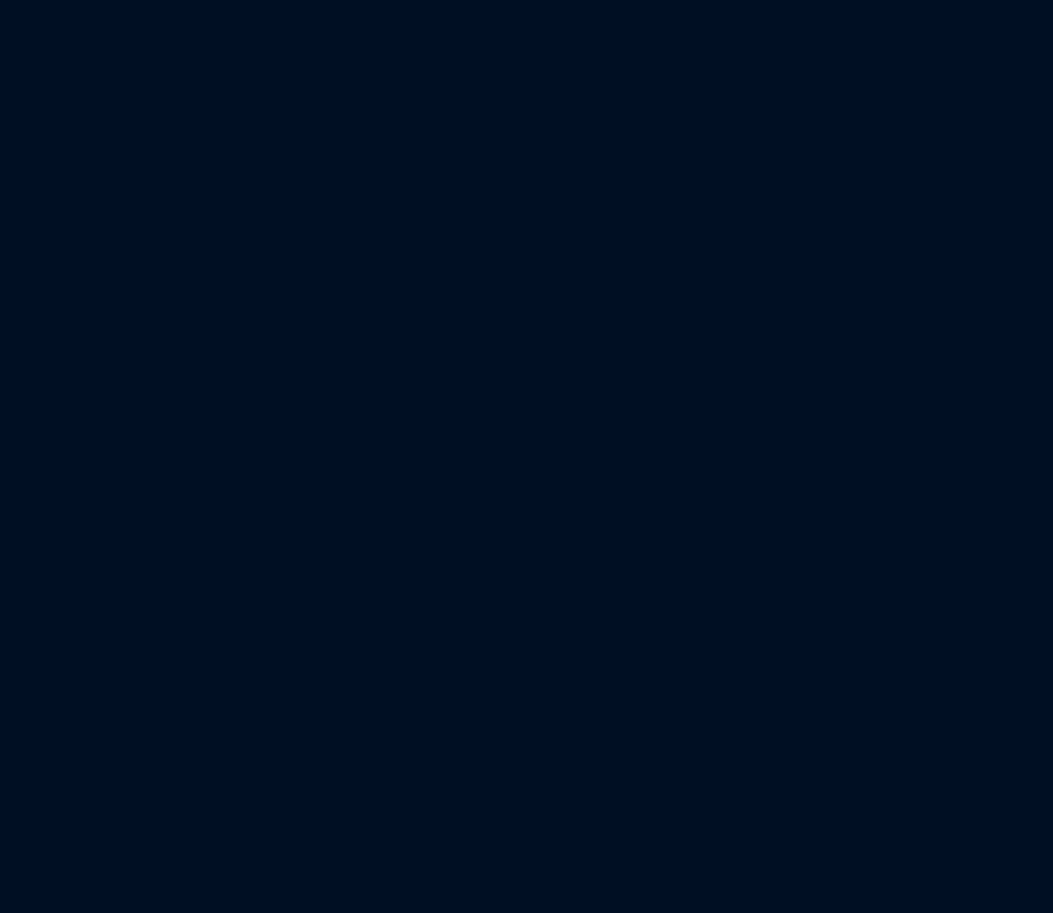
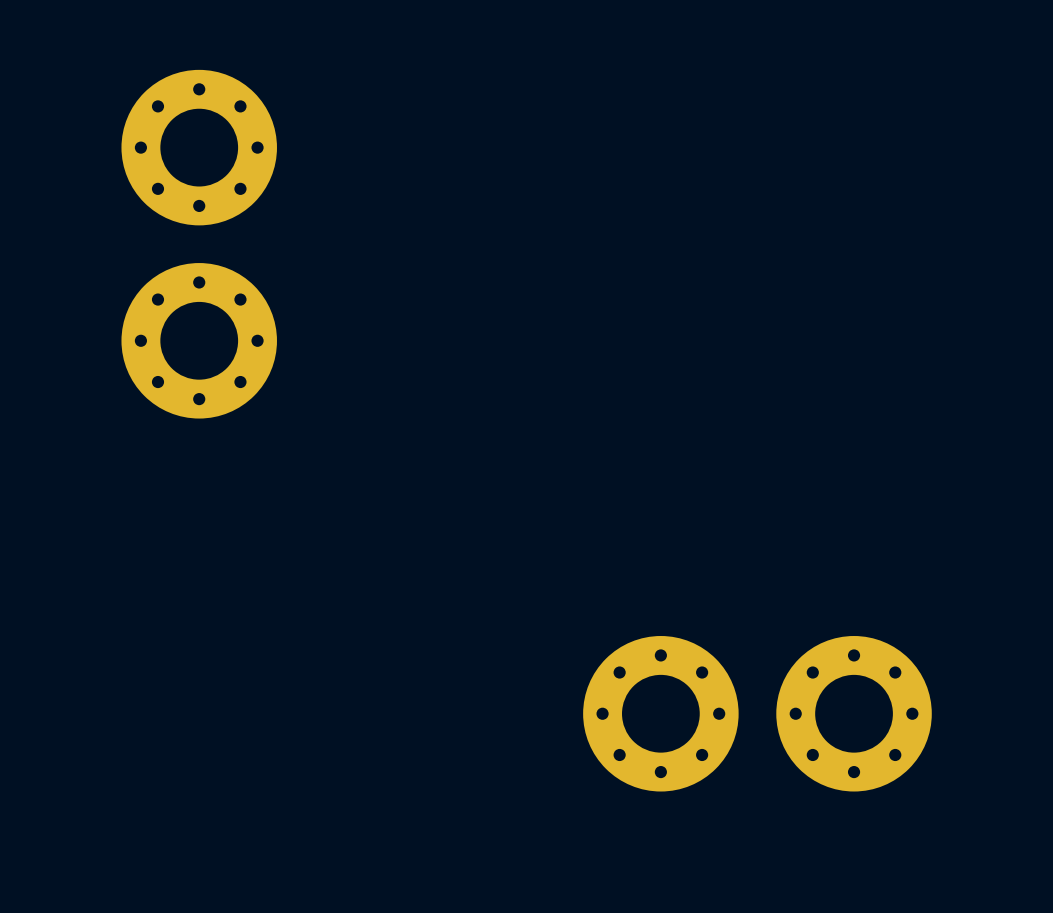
part: none -> (199, 147)
part: none -> (199, 340)
part: none -> (660, 713)
part: none -> (854, 713)

